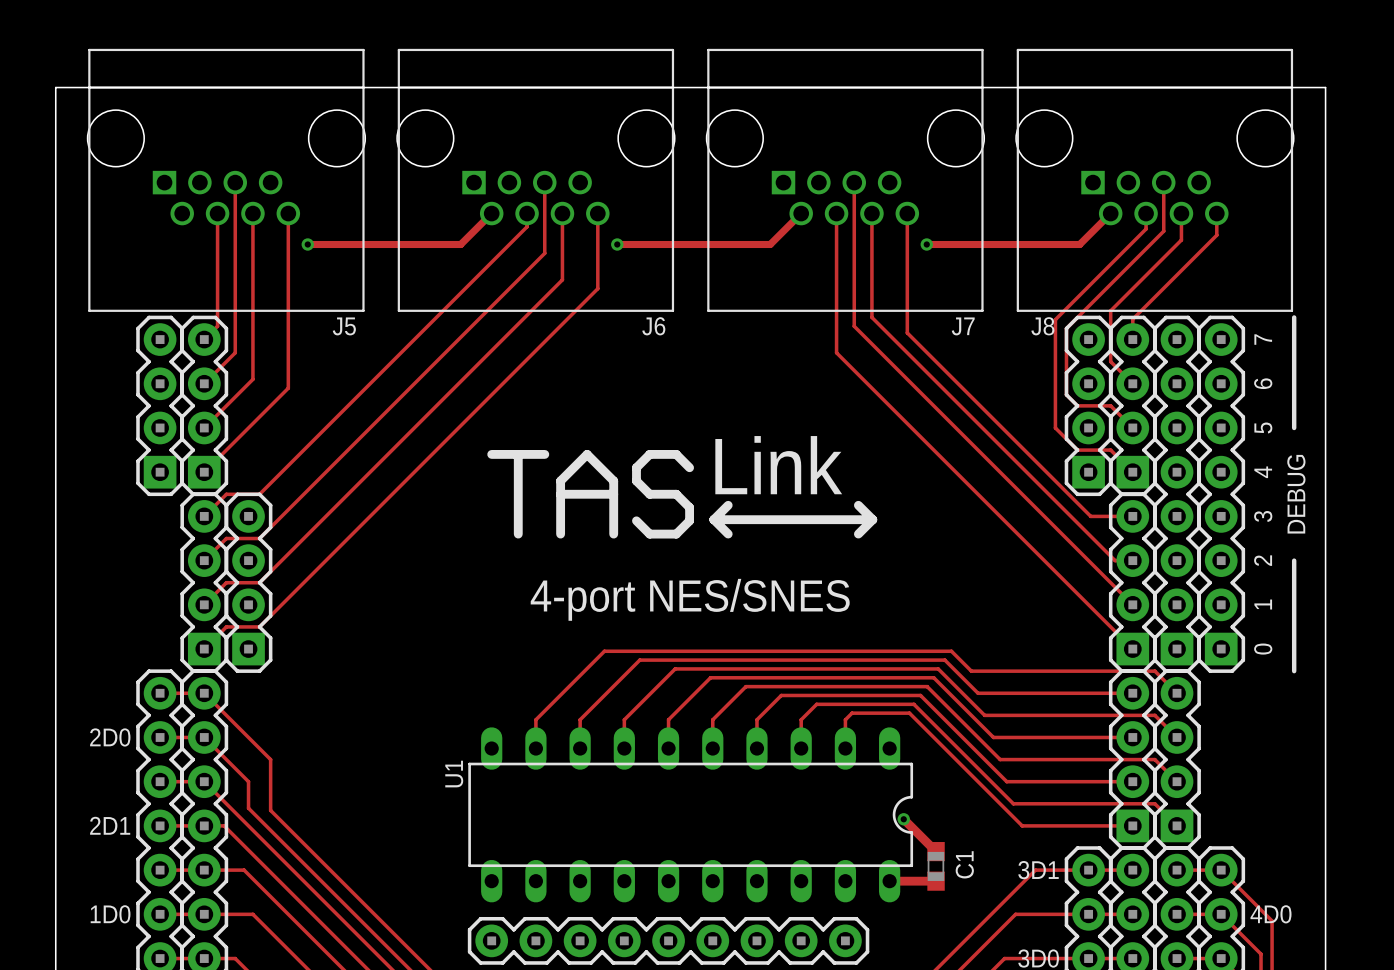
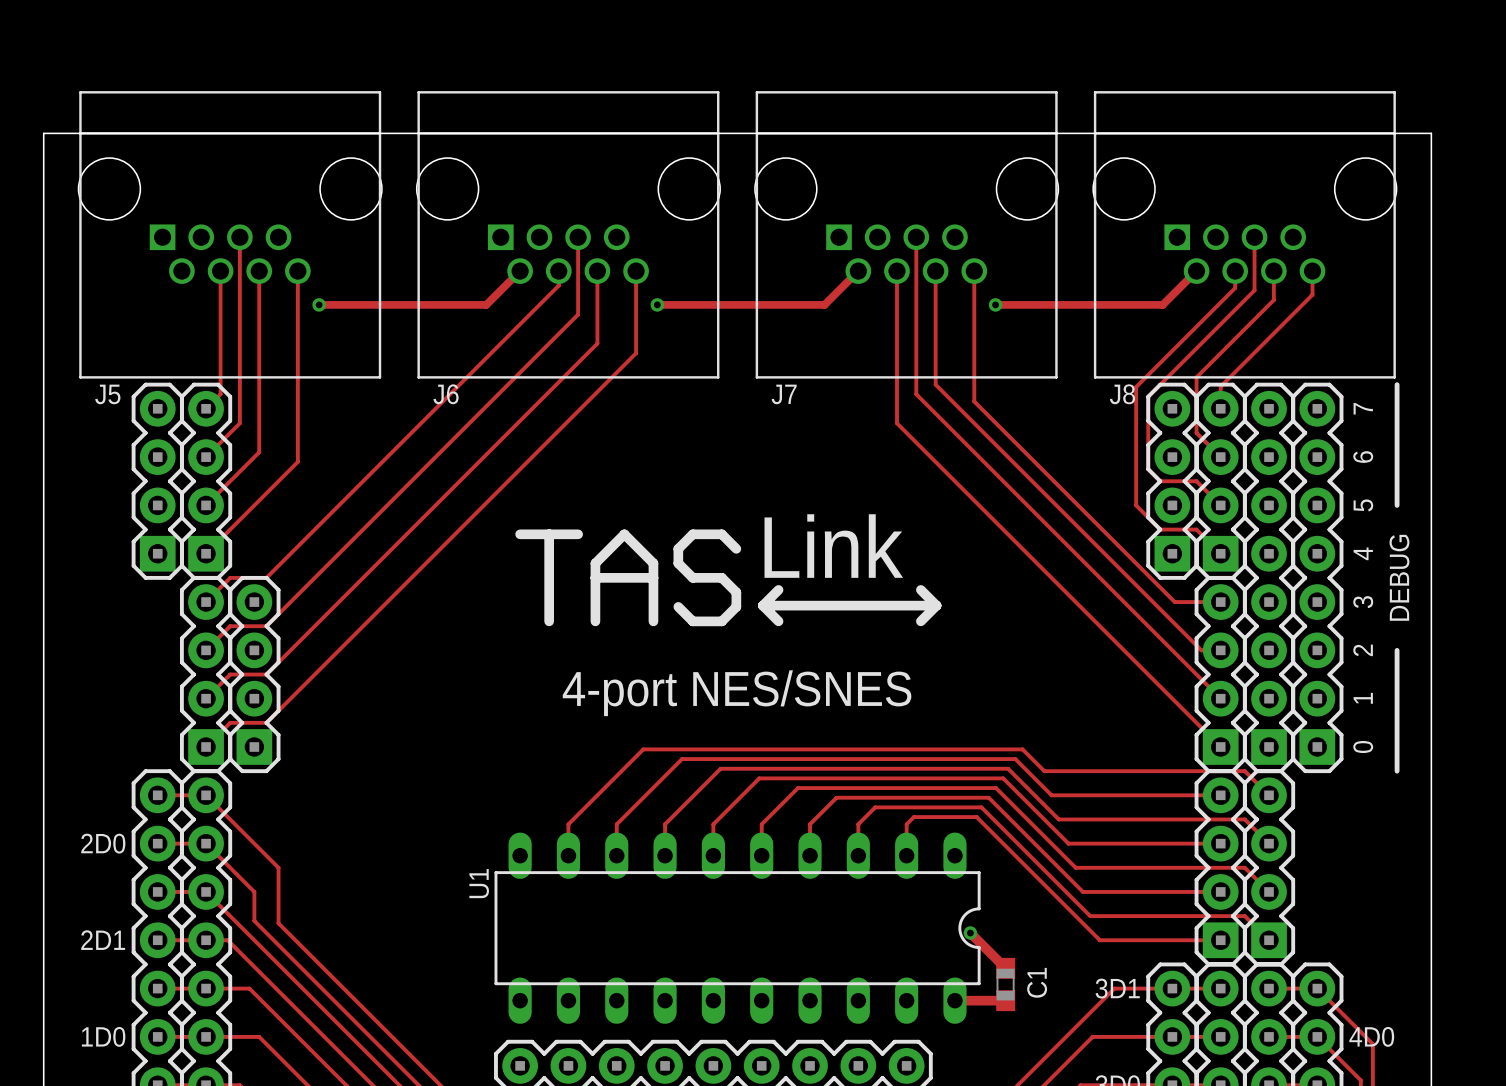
J5 name position: J5 (344, 326) -> J5 (107, 394)
J6 name position: J6 (653, 326) -> J6 (446, 394)
J7 name position: J7 (963, 326) -> J7 (784, 394)

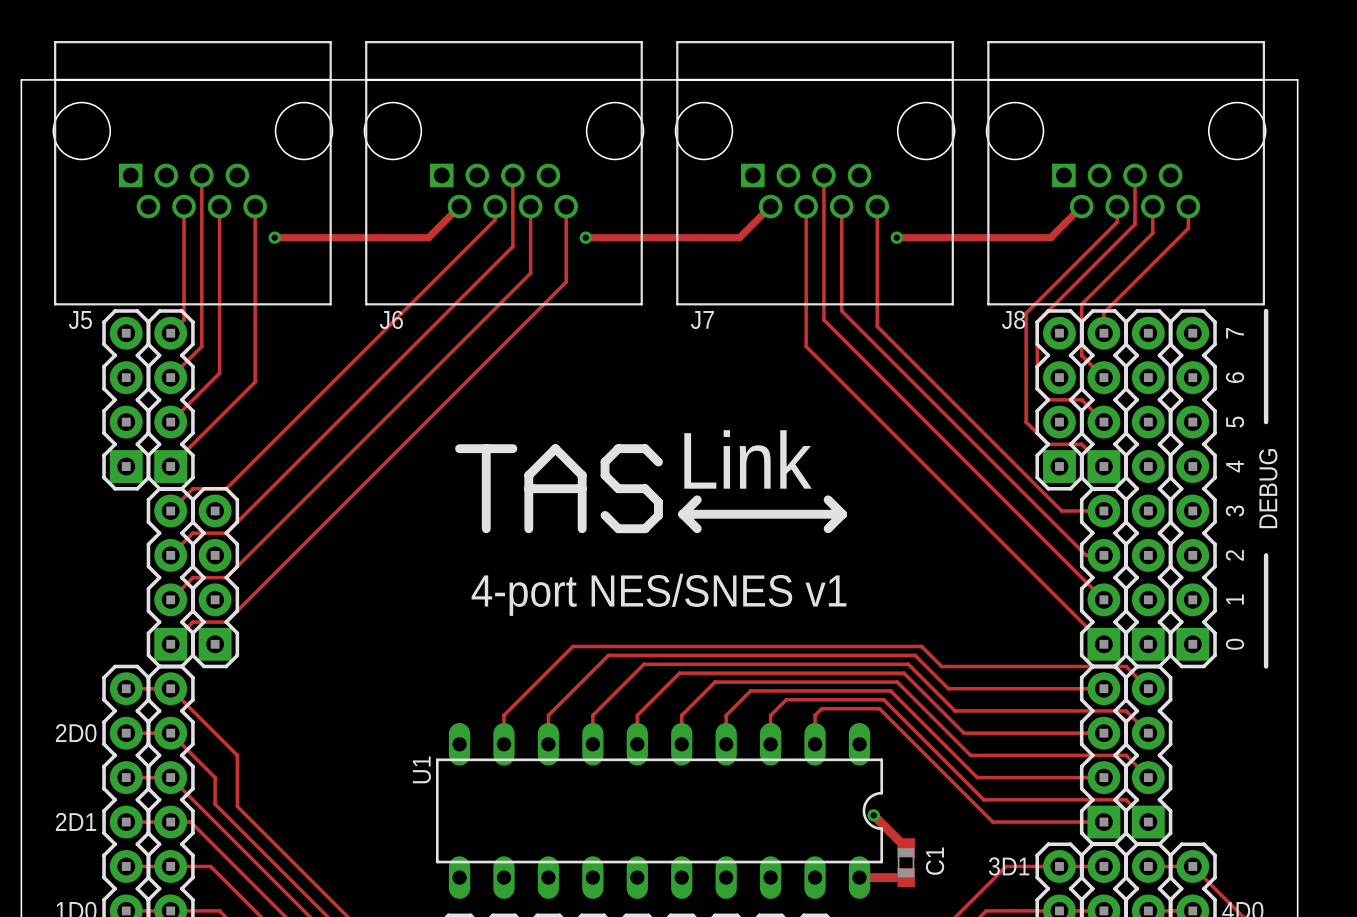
text: 4-port NES/SNES (737, 693) -> 4-port NES/SNES v1 (658, 594)

